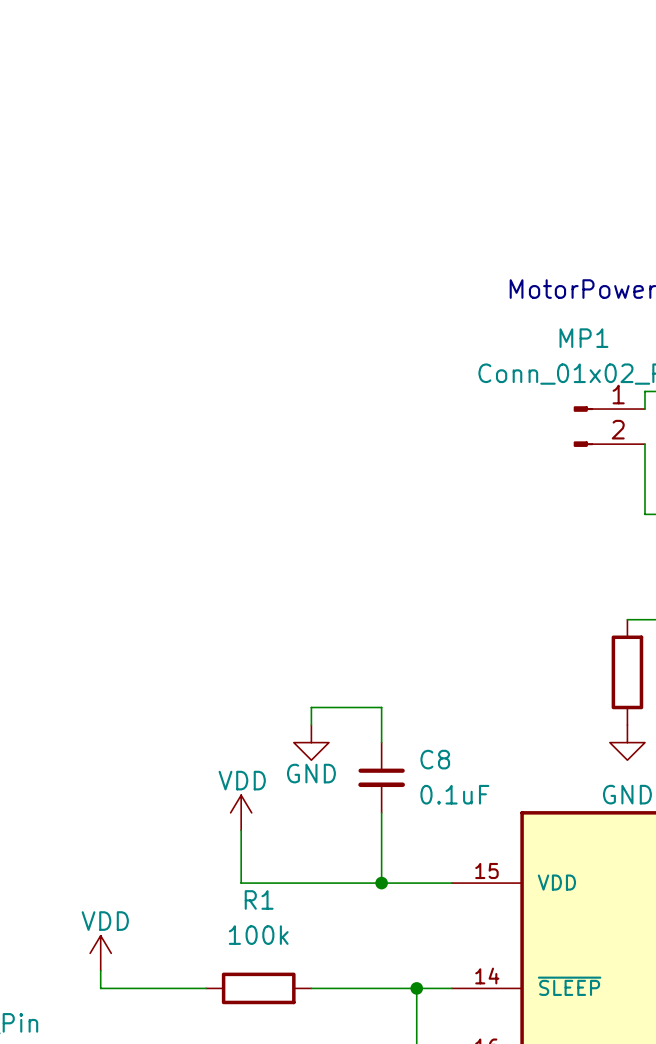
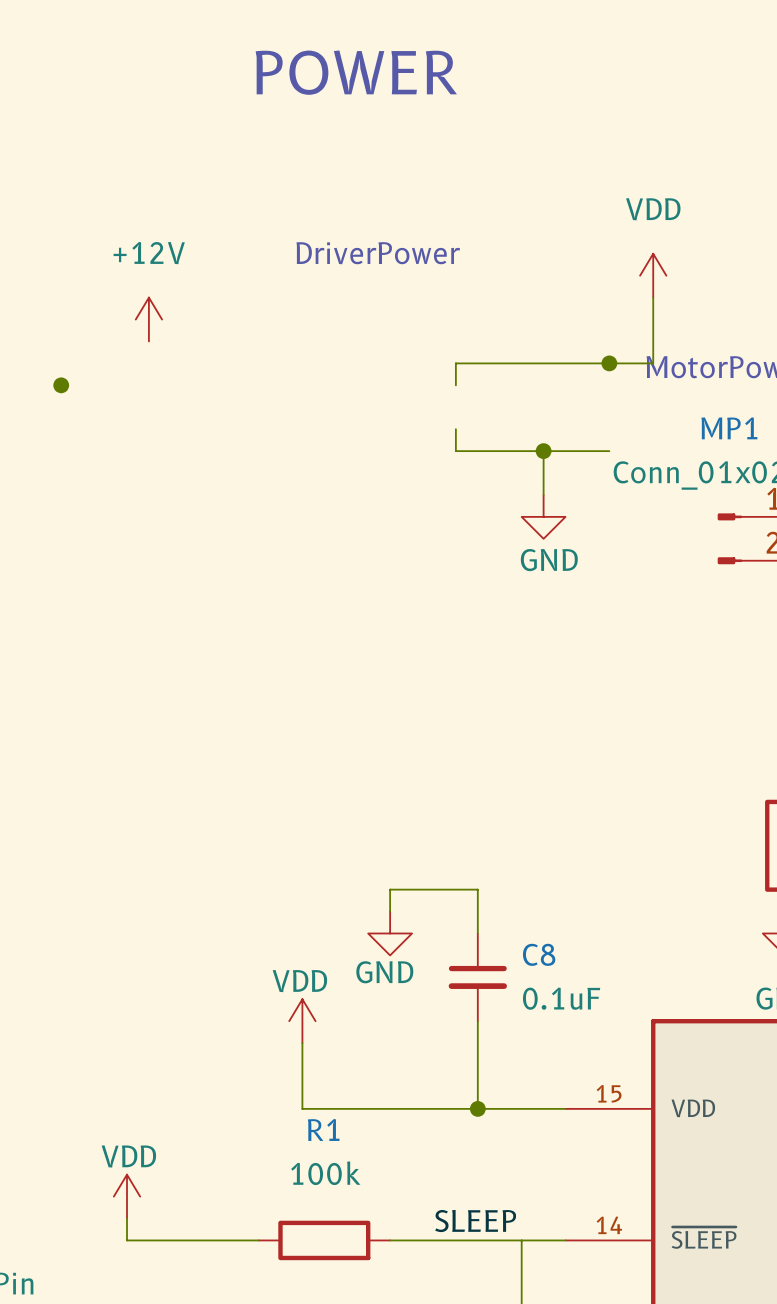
text: none -> POWER (356, 72)
text: none -> DriverPower (378, 253)
power symbol: none -> VDD (653, 275)
wire: none -> (653, 297) (653, 363) (455, 363) (455, 385)
power symbol: none -> +12V (148, 319)
junction: none -> (609, 363)
junction: none -> (61, 385)
wire: none -> (455, 429) (455, 451) (609, 451)
wire: none -> (543, 451) (543, 494)
junction: none -> (543, 451)
power symbol: none -> GND (543, 516)
label: none -> SLEEP (475, 1221)
junction: (416, 988) -> none

